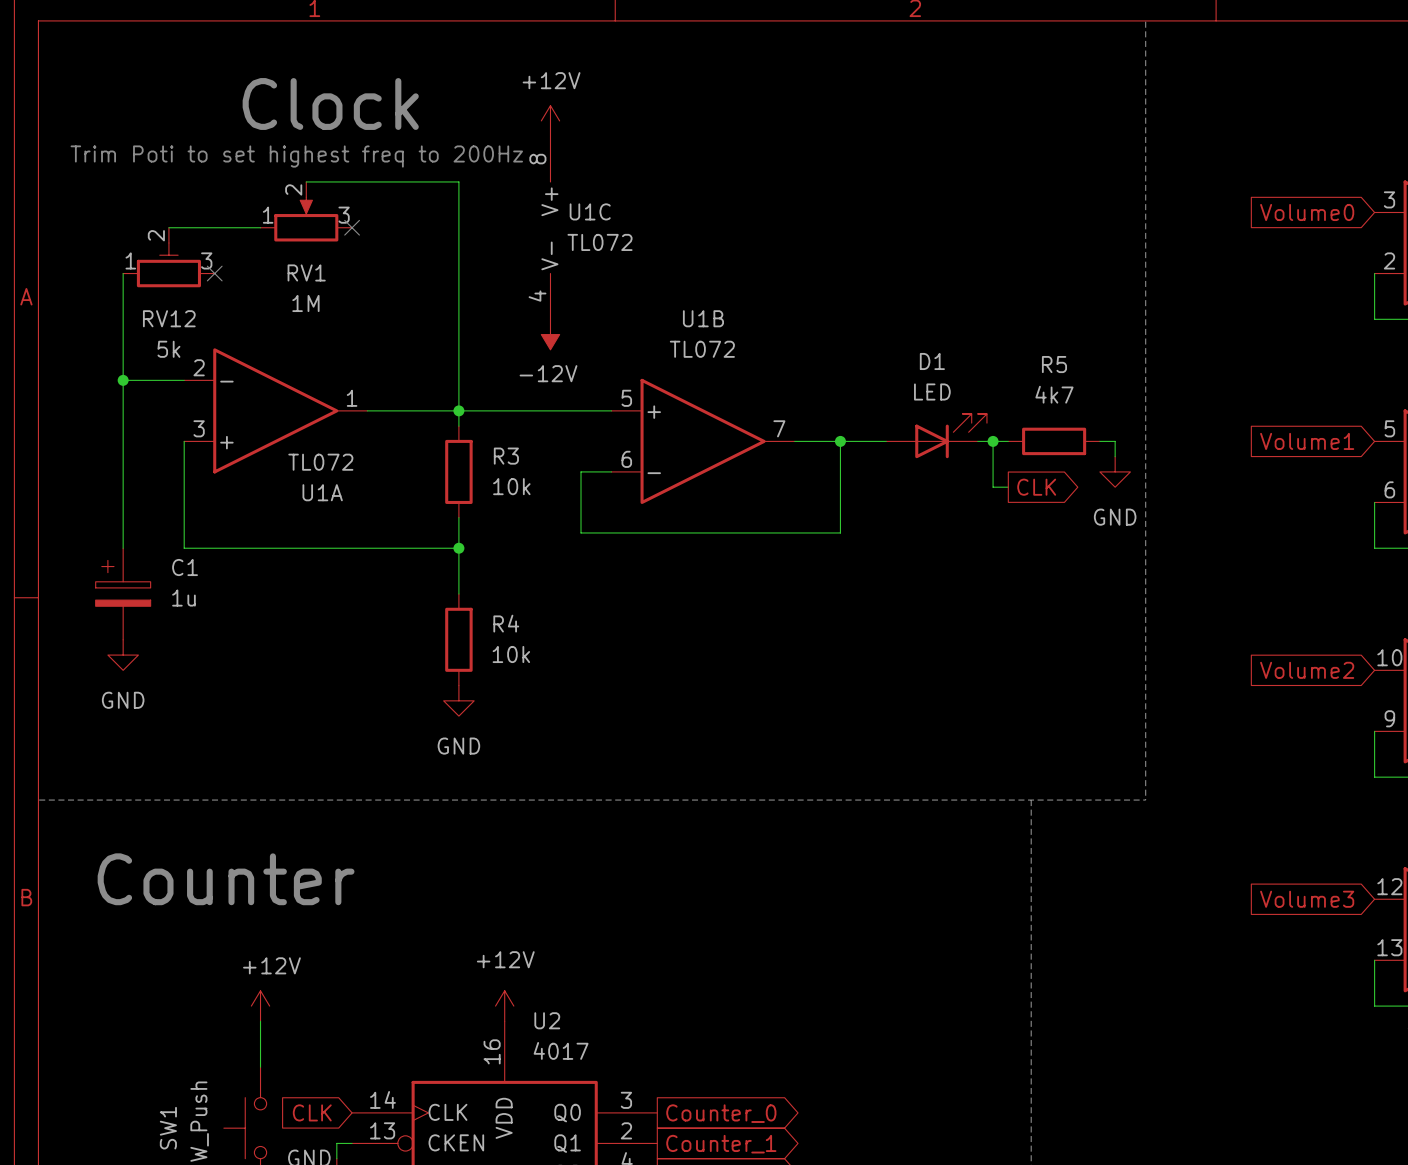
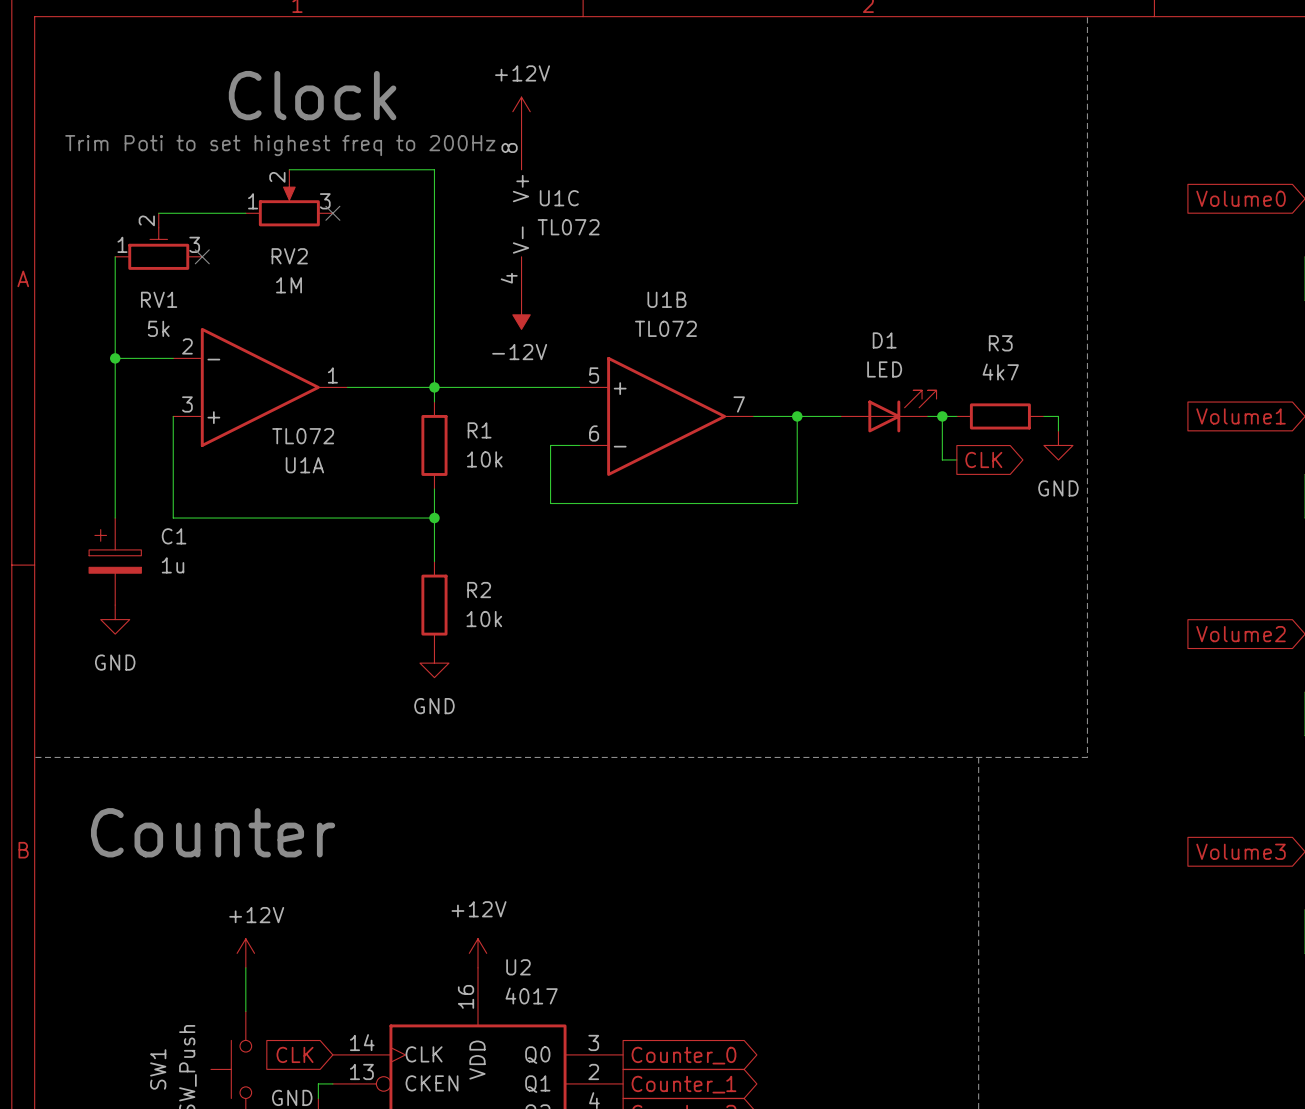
RV1 name: RV1 (306, 272) -> RV2 (289, 256)
RV12 name: RV12 (169, 318) -> RV1 (159, 299)
R5 name: R5 (1054, 364) -> R3 (1000, 343)
R3 name: R3 (506, 456) -> R1 (479, 430)
R4 name: R4 (506, 623) -> R2 (479, 590)

